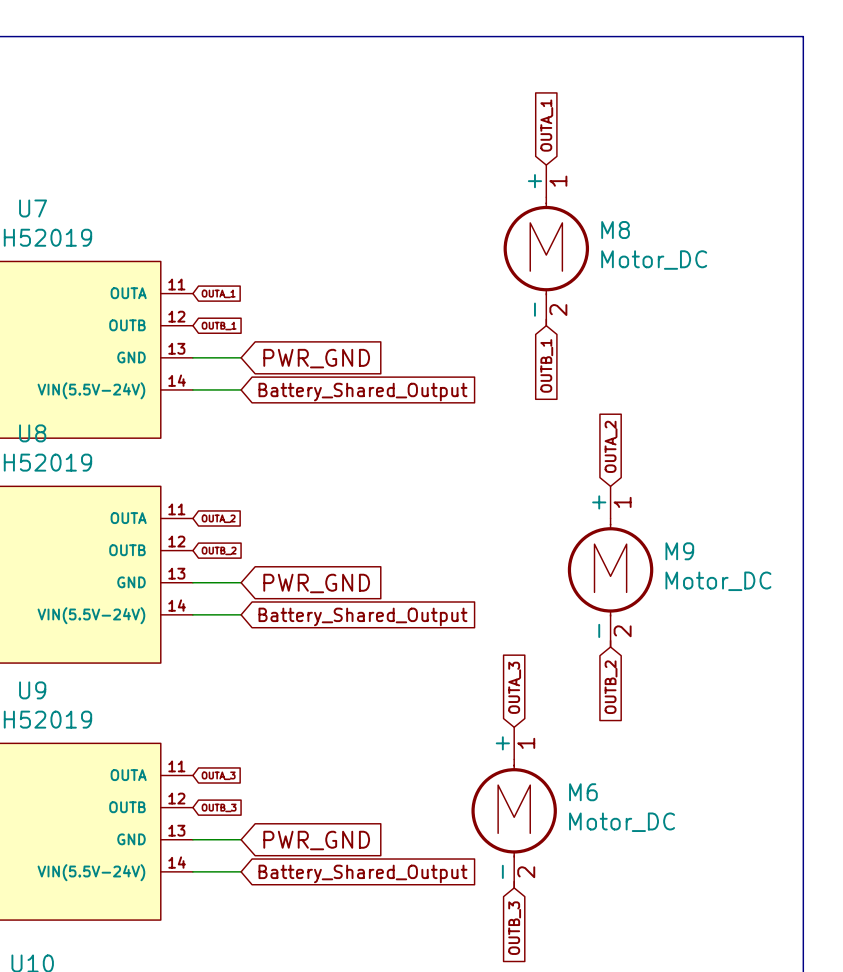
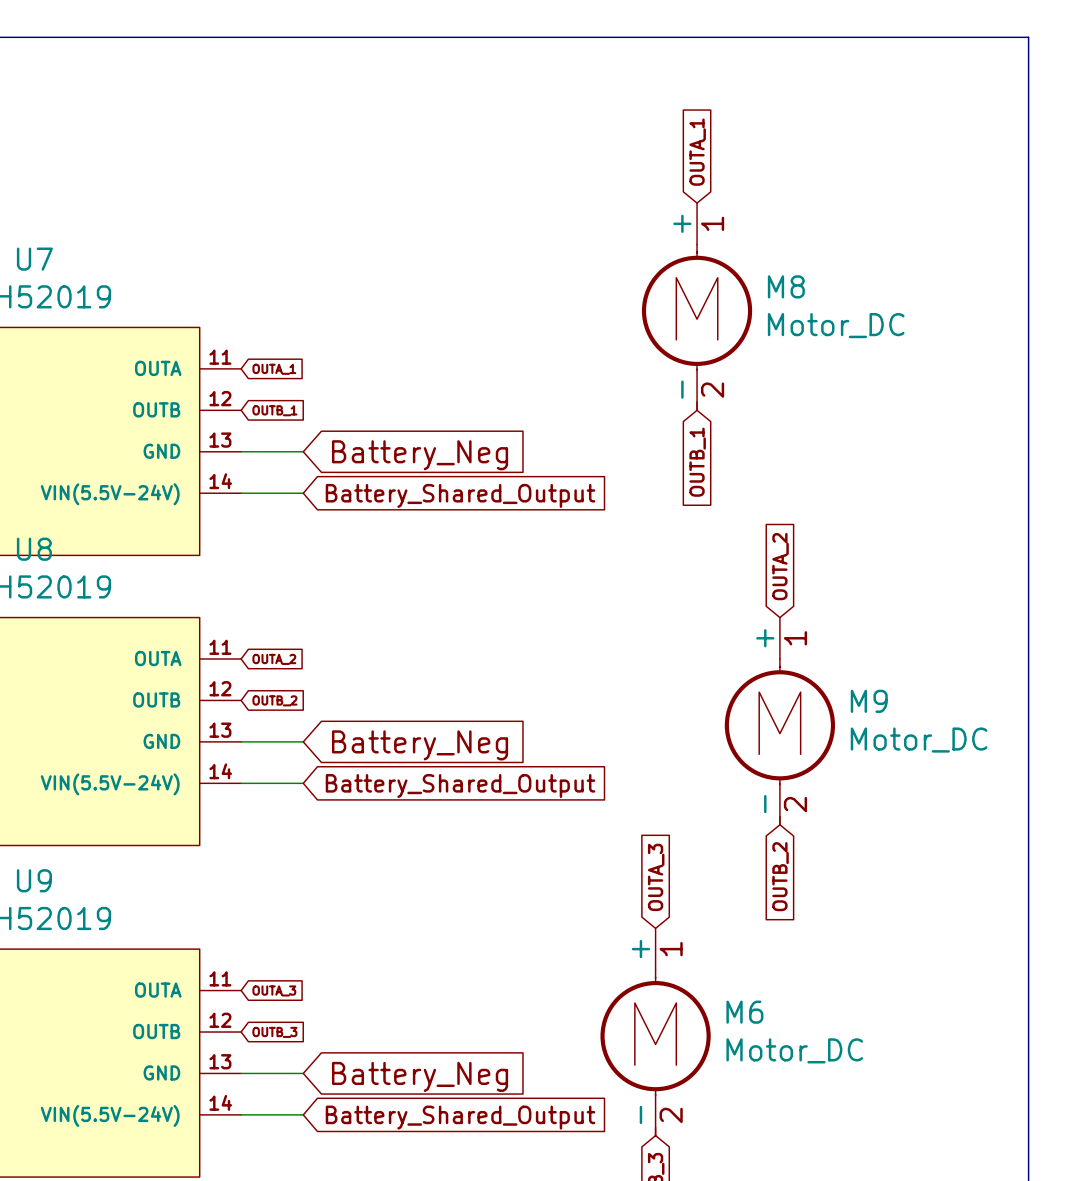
global label: PWR_GND (316, 358) -> Battery_Neg (420, 455)
global label: PWR_GND (316, 583) -> Battery_Neg (420, 745)
global label: PWR_GND (316, 840) -> Battery_Neg (420, 1076)

